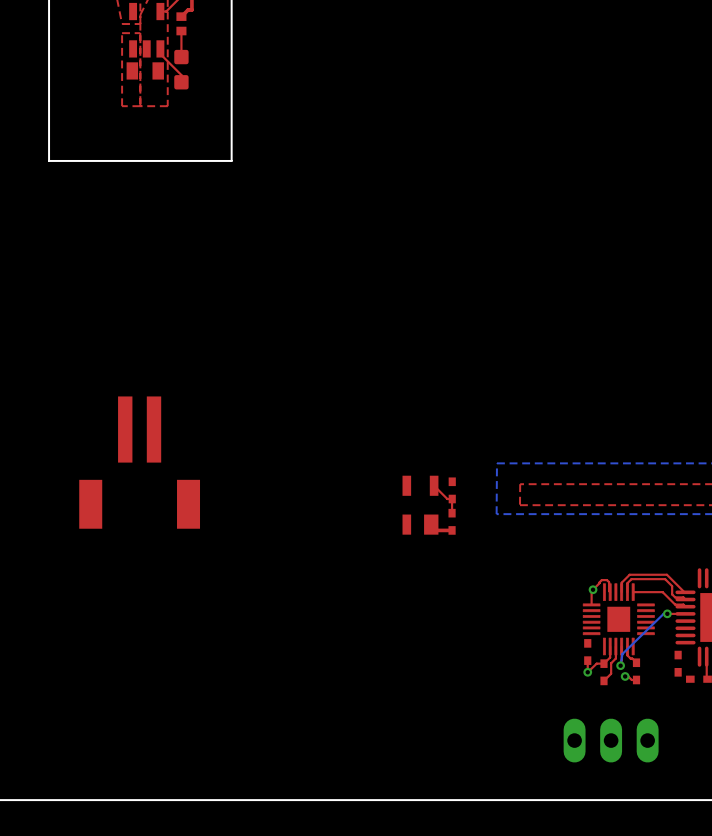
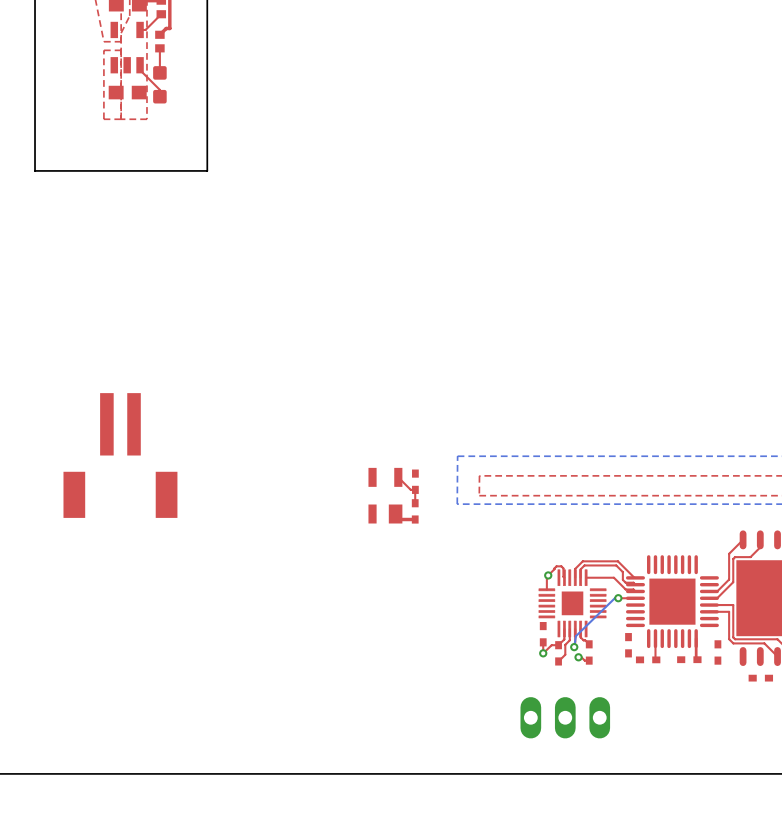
part footprint: [126, 62, 164, 80] -> [108, 85, 147, 100]

